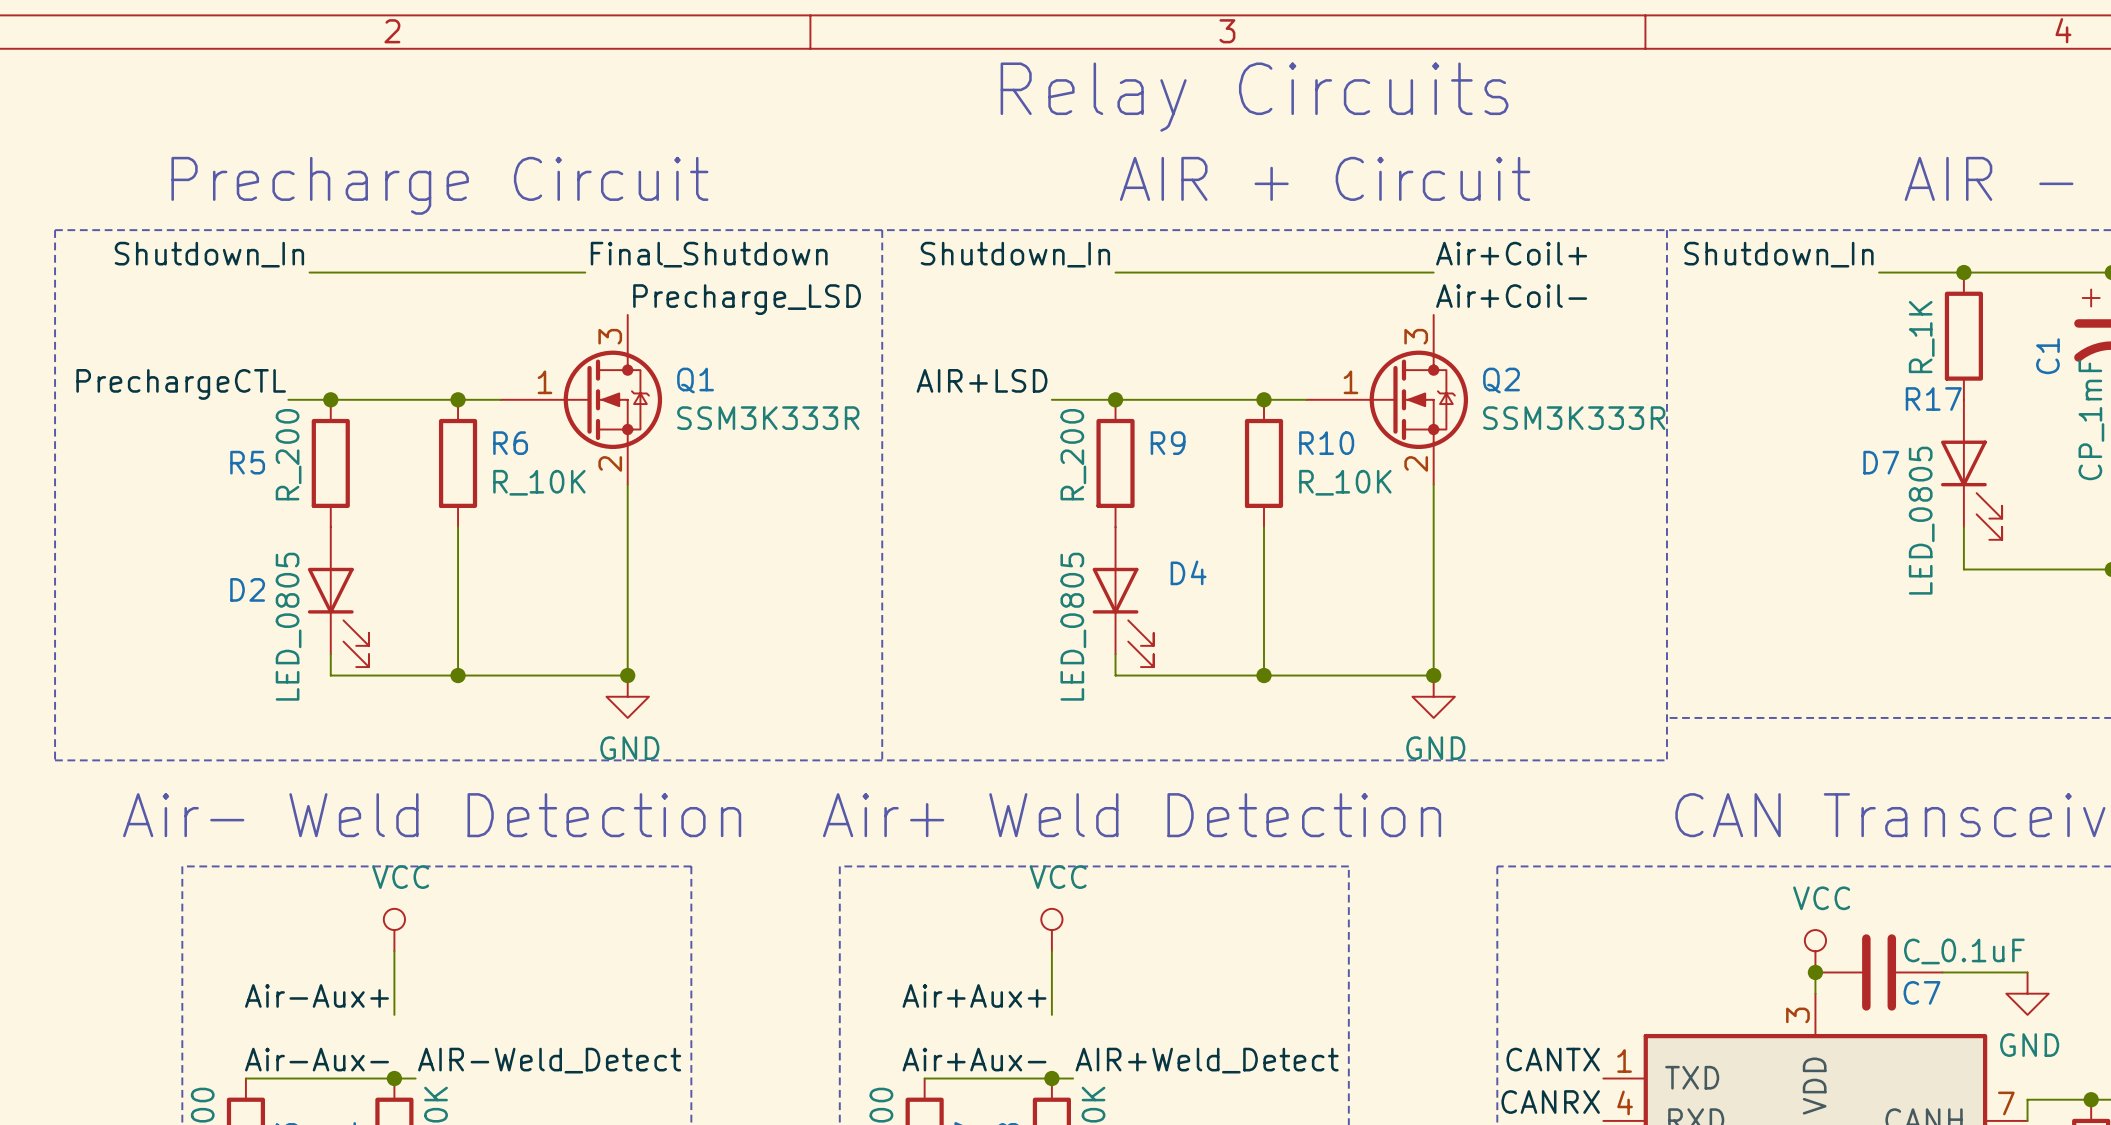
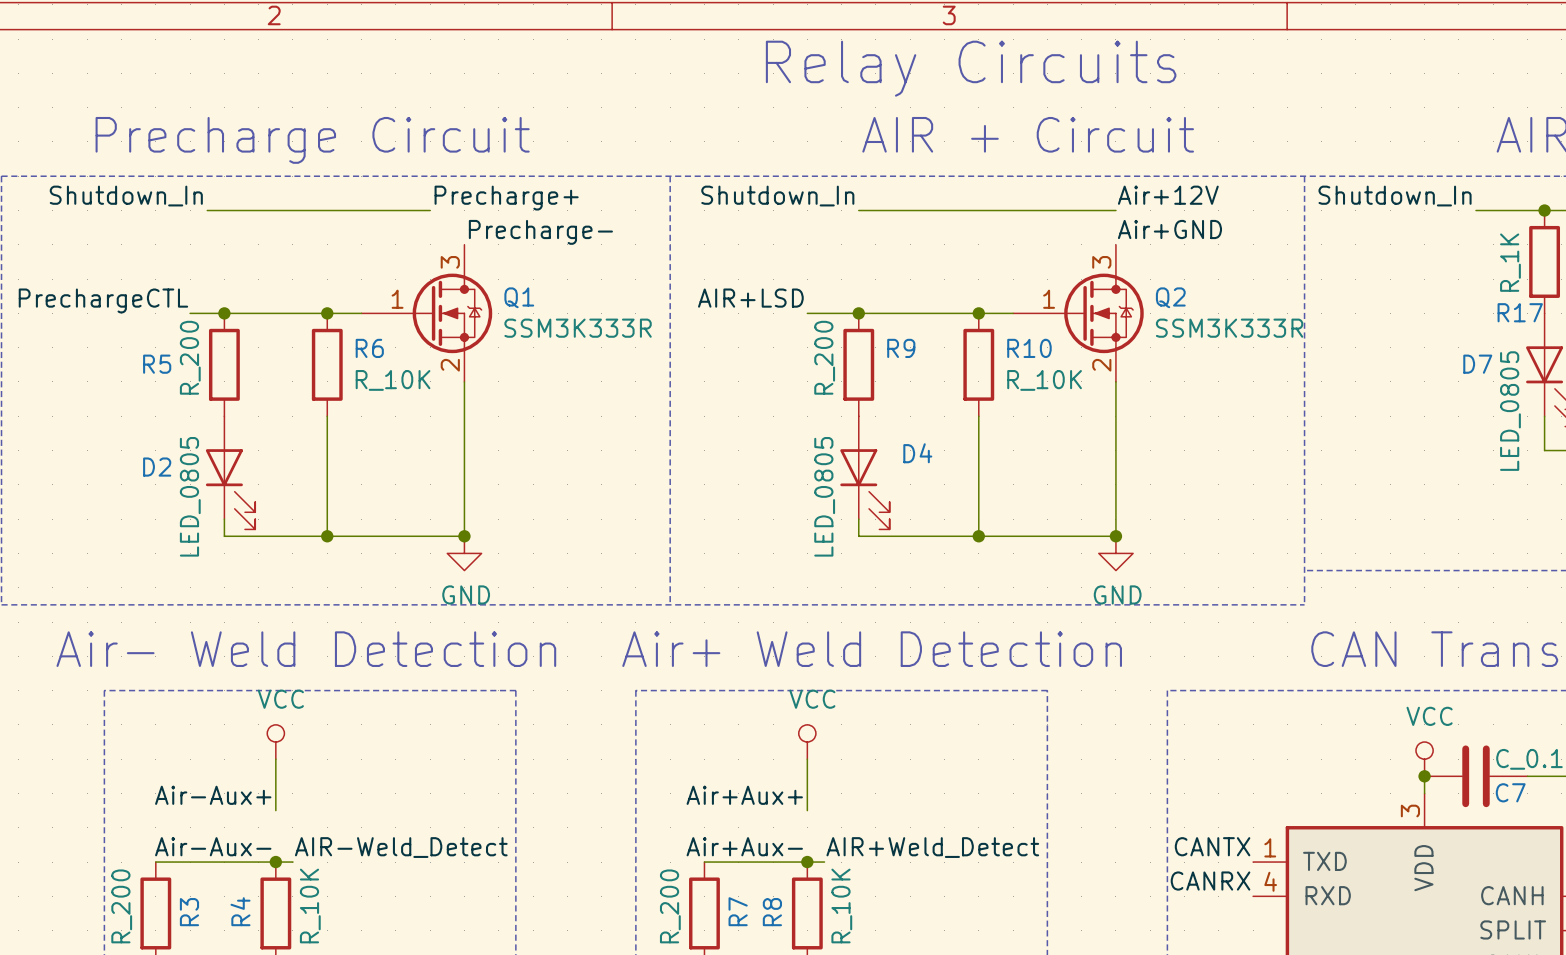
label: Air+Coil+ (1511, 253) -> Air+12V (1168, 195)
label: Final_Shutdown (709, 254) -> Precharge+ (506, 198)
label: Air+Coil- (1511, 296) -> Air+GND (1169, 229)
label: Precharge_LSD (747, 299) -> Precharge- (540, 232)

